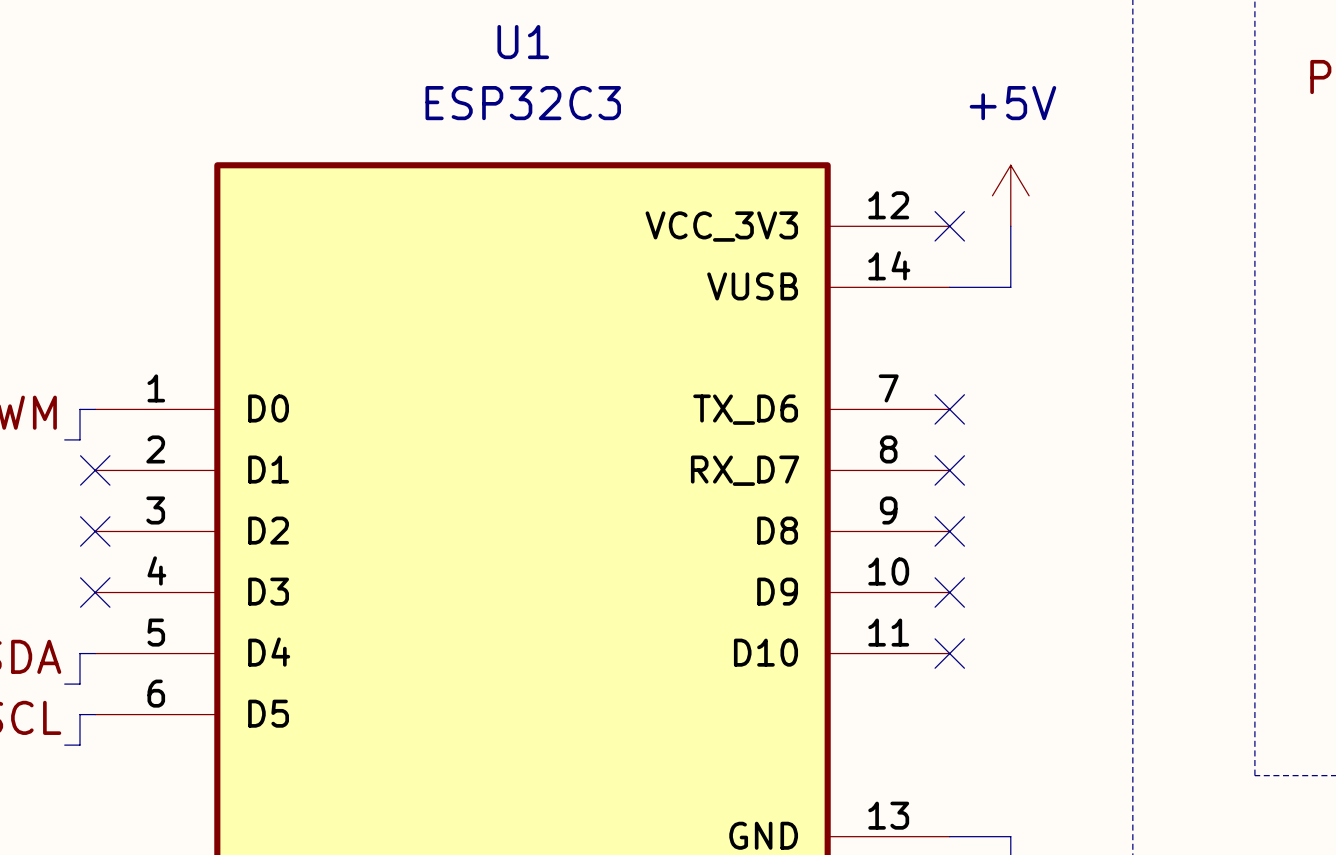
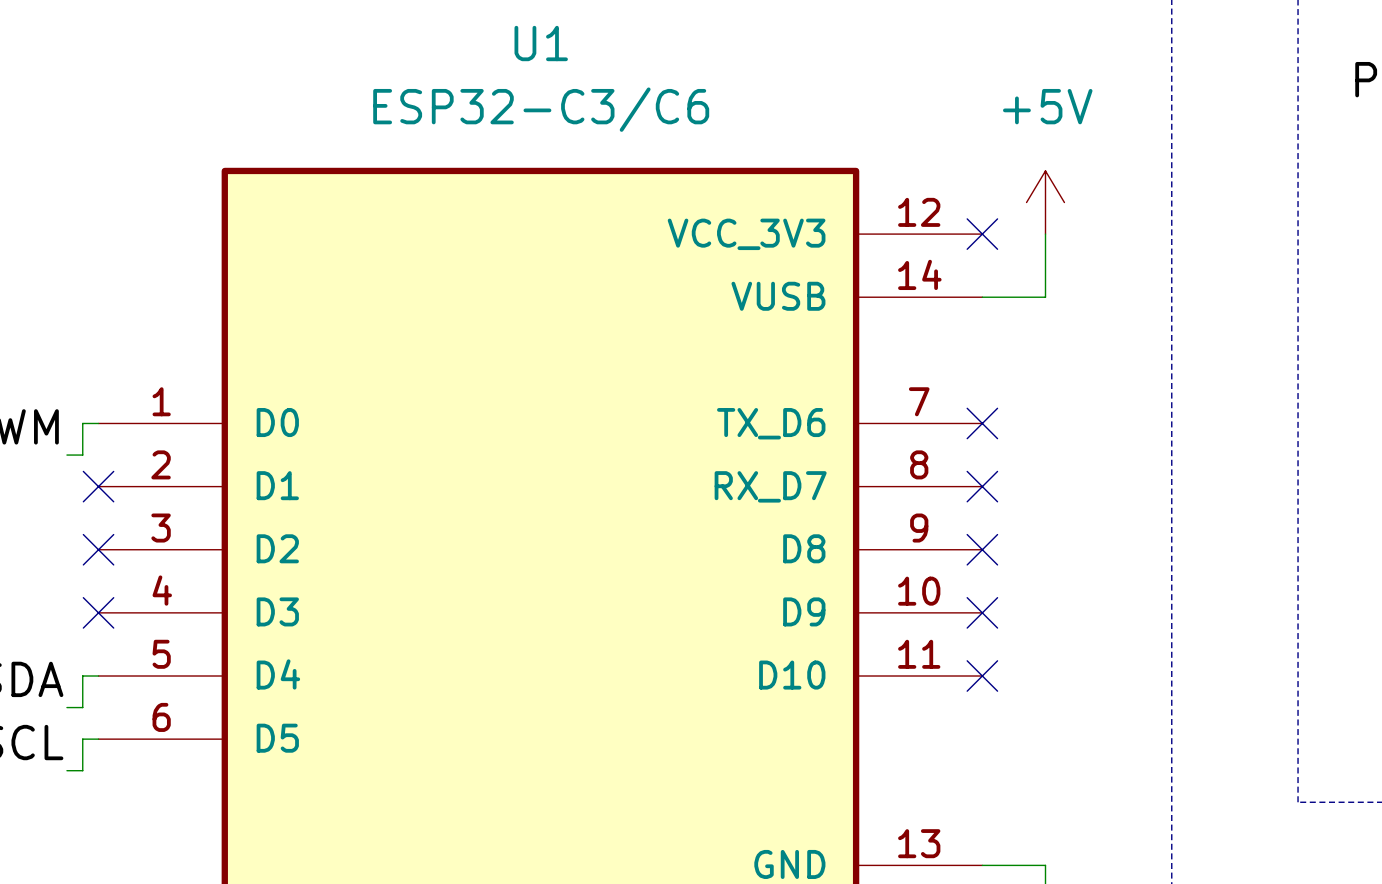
U1 value: ESP32C3 (523, 103) -> ESP32-C3/C6 (541, 109)

